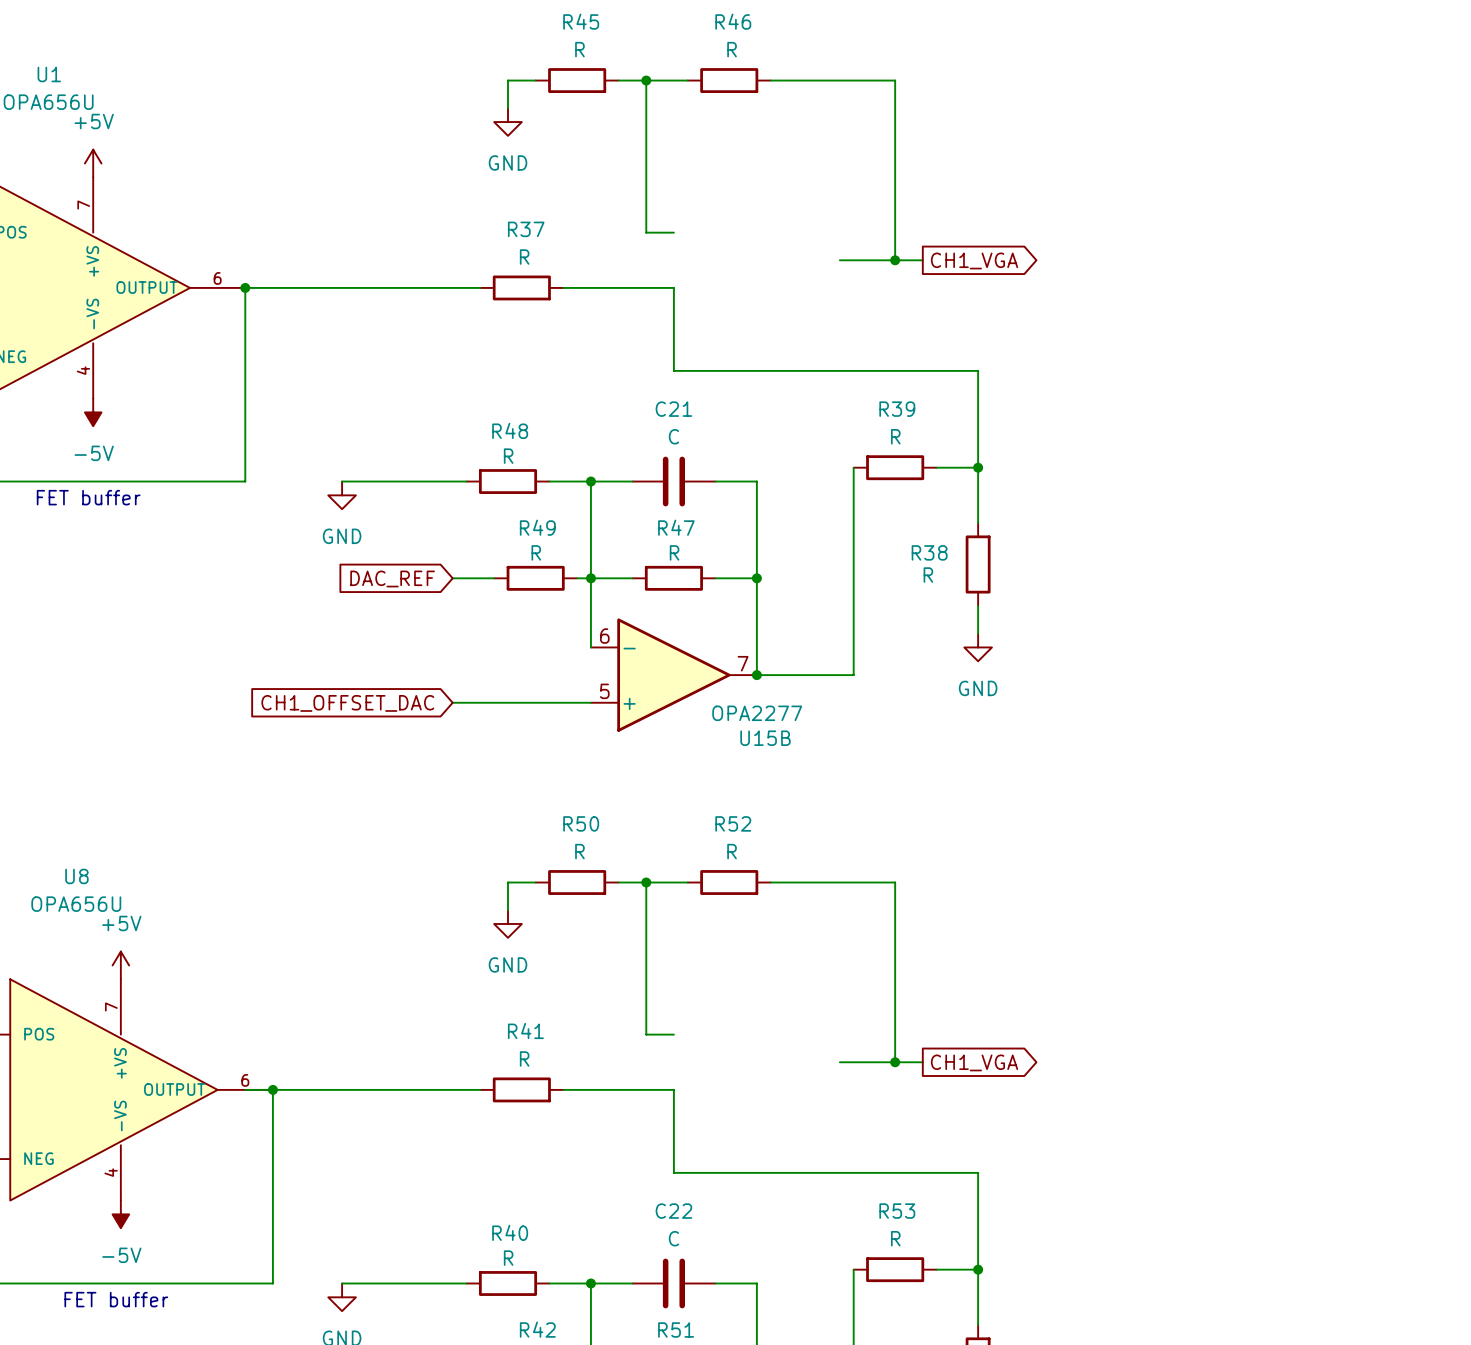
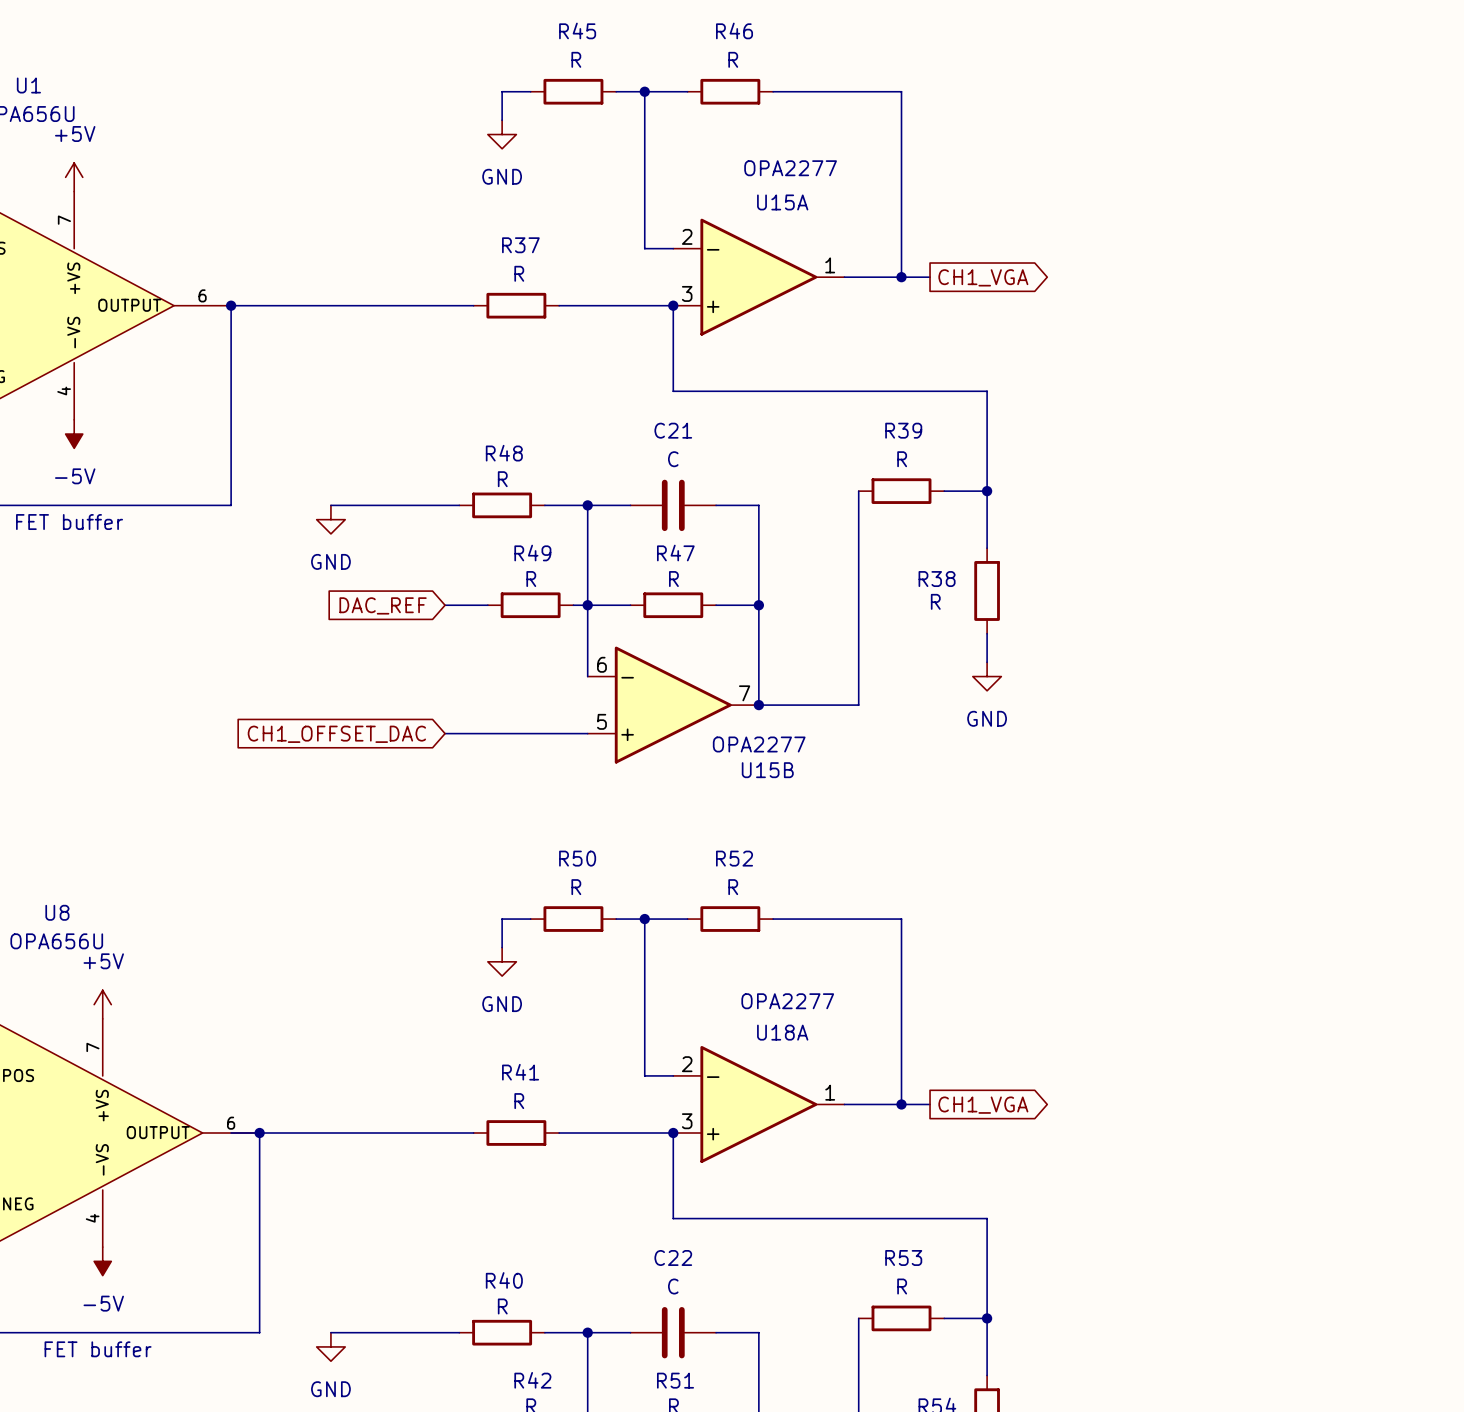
U15A: none -> OPA2277 (758, 277)
junction: none -> (673, 305)
U18A: none -> OPA2277 (758, 1104)
junction: none -> (673, 1133)

